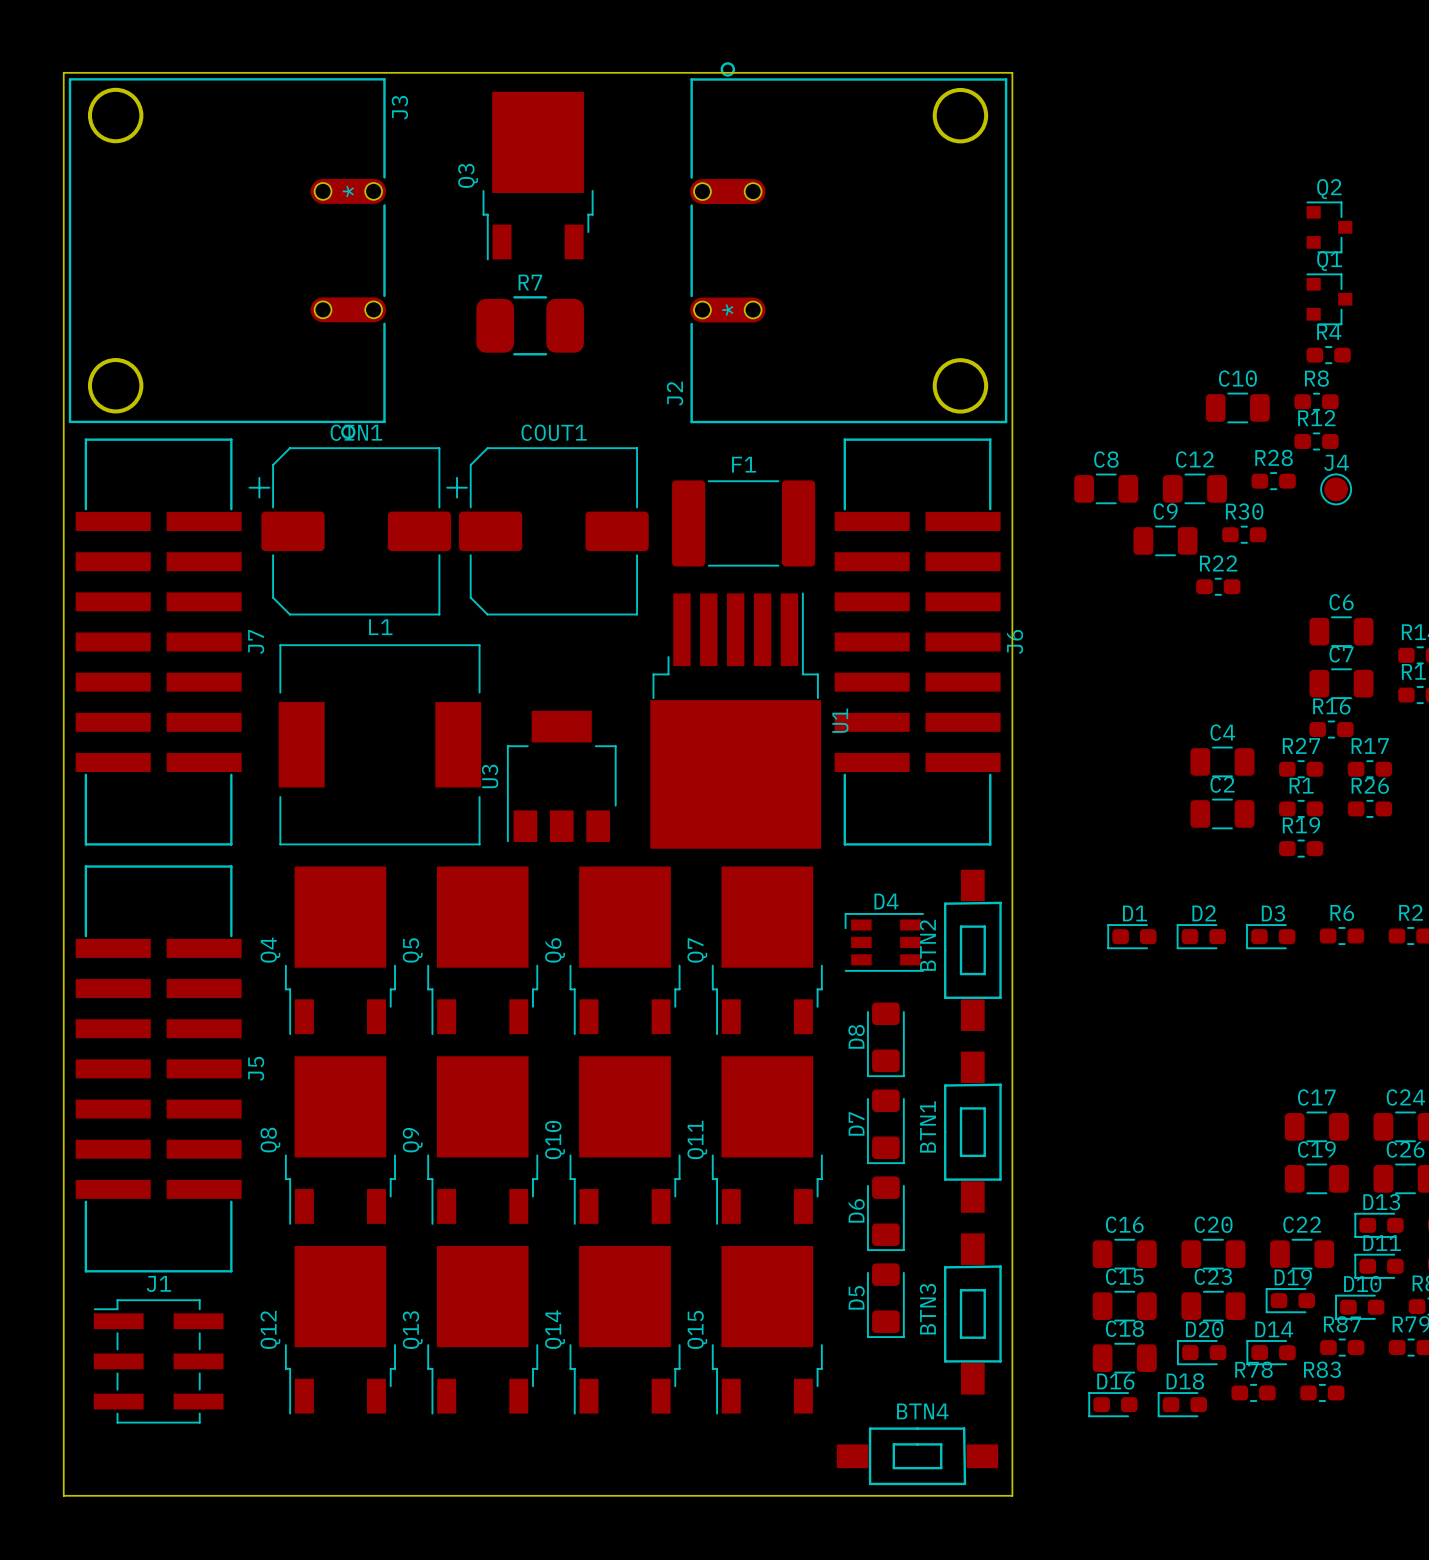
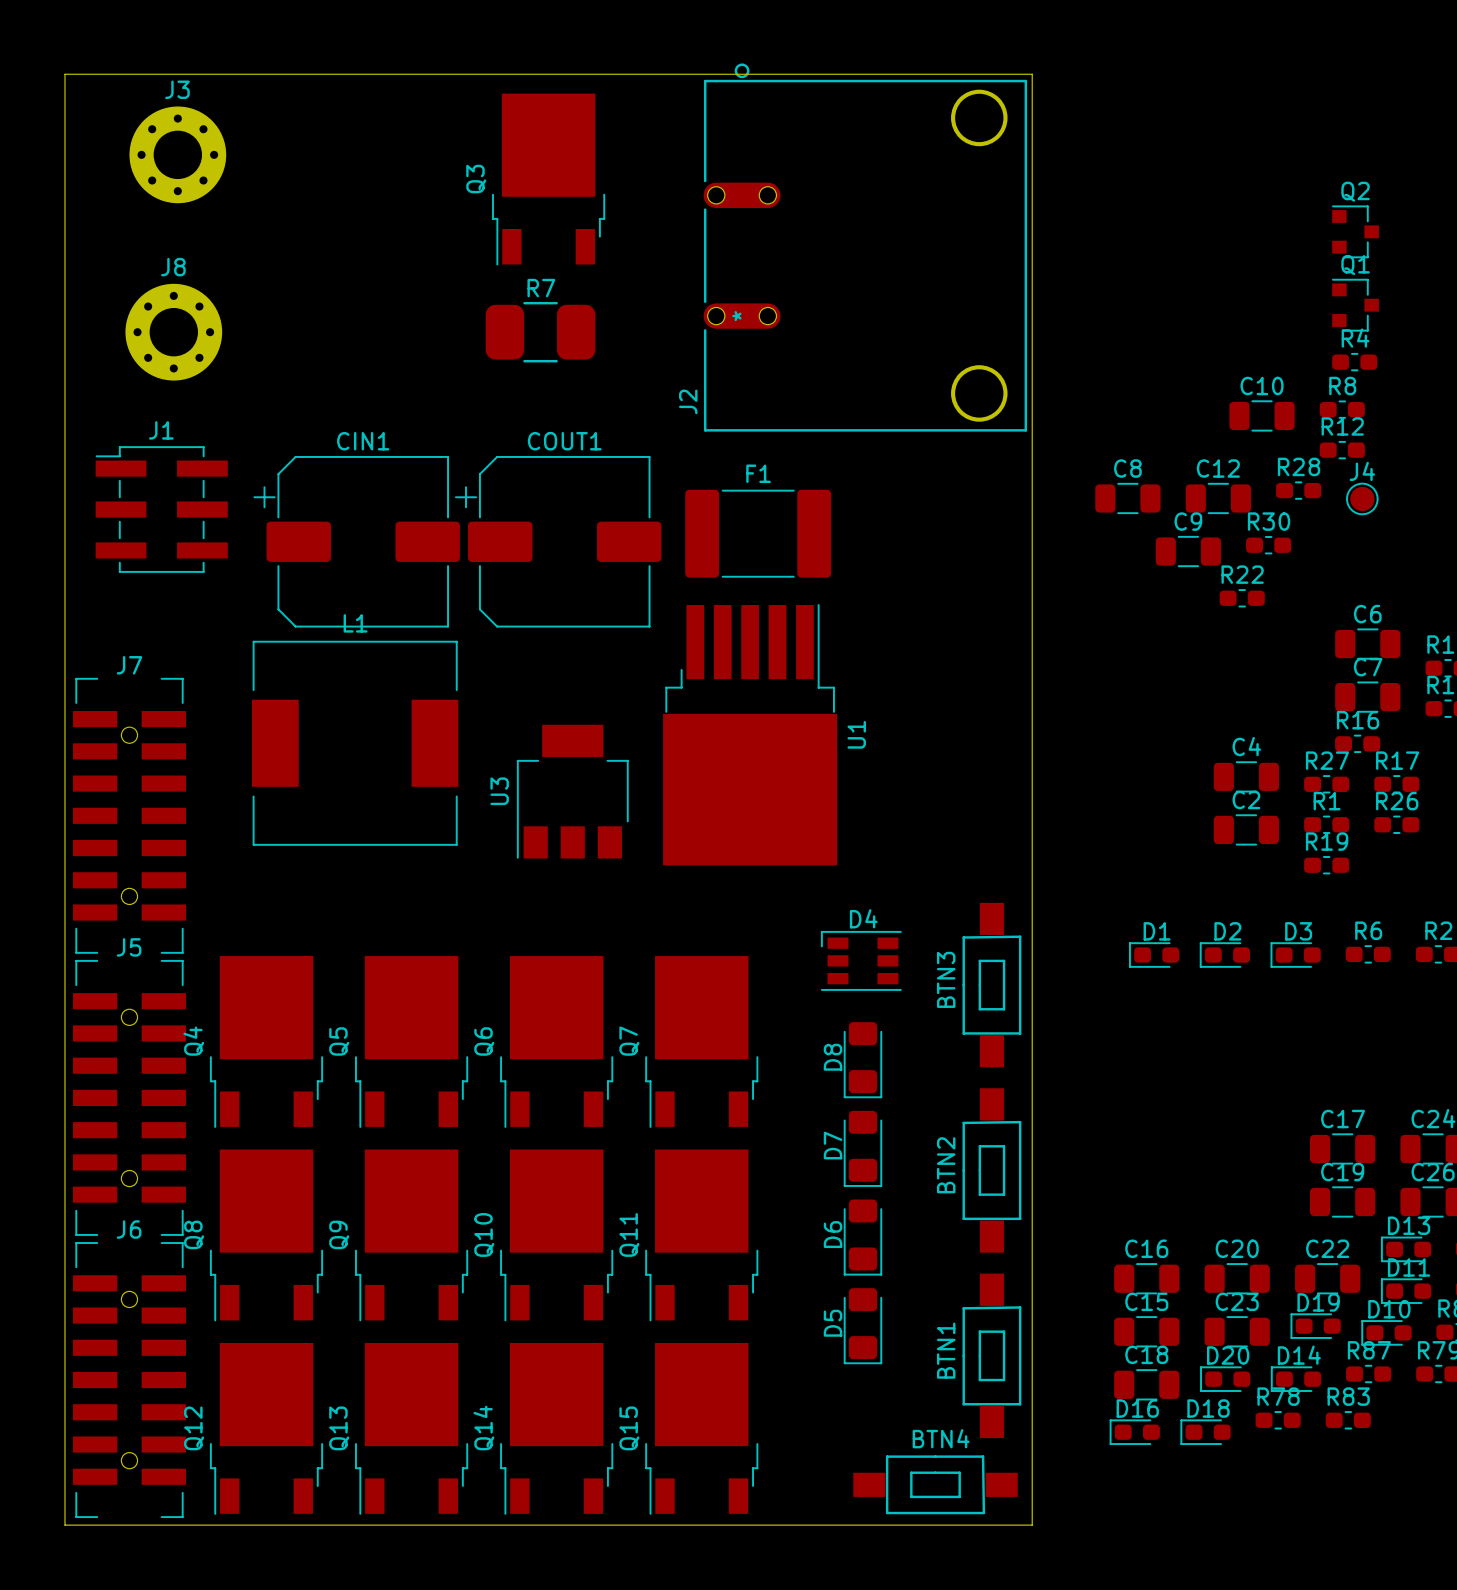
J3 footprint: [68, 78, 387, 440] -> [129, 106, 227, 204]
J3 name position: J3 (399, 107) -> J3 (177, 89)
J8: none -> (173, 332)
J7 footprint: [75, 438, 242, 846] -> [72, 677, 186, 954]
J6 footprint: [834, 438, 1001, 846] -> [72, 1242, 186, 1519]
J7 name position: J7 (256, 641) -> J7 (129, 665)
J6 name position: J6 (1015, 641) -> J6 (129, 1229)
L1 position: (379, 744) -> (355, 743)
J5 footprint: [75, 865, 242, 1273] -> [72, 959, 186, 1236]
D4 position: (884, 942) -> (861, 960)
Q4 position: (340, 950) -> (266, 1041)
Q5 position: (482, 950) -> (411, 1041)
Q6 position: (625, 950) -> (556, 1041)
Q7 position: (767, 950) -> (701, 1041)
BTN2 position: (972, 950) -> (991, 1170)
D8 position: (885, 1039) -> (862, 1060)
J5 name position: J5 (256, 1068) -> J5 (129, 947)
D7 position: (885, 1126) -> (862, 1148)
BTN1 position: (972, 1132) -> (991, 1355)
Q8 position: (340, 1140) -> (266, 1235)
Q9 position: (482, 1140) -> (411, 1235)
Q10 position: (625, 1140) -> (556, 1235)
Q11 position: (767, 1140) -> (701, 1235)
D6 position: (885, 1213) -> (862, 1237)
D5 position: (885, 1300) -> (862, 1326)
BTN3 position: (972, 1313) -> (991, 985)
Q12 position: (340, 1330) -> (266, 1428)
Q13 position: (482, 1330) -> (411, 1428)
Q14 position: (625, 1330) -> (556, 1428)
Q15 position: (767, 1330) -> (701, 1428)
J1 position: (158, 1361) -> (161, 509)

